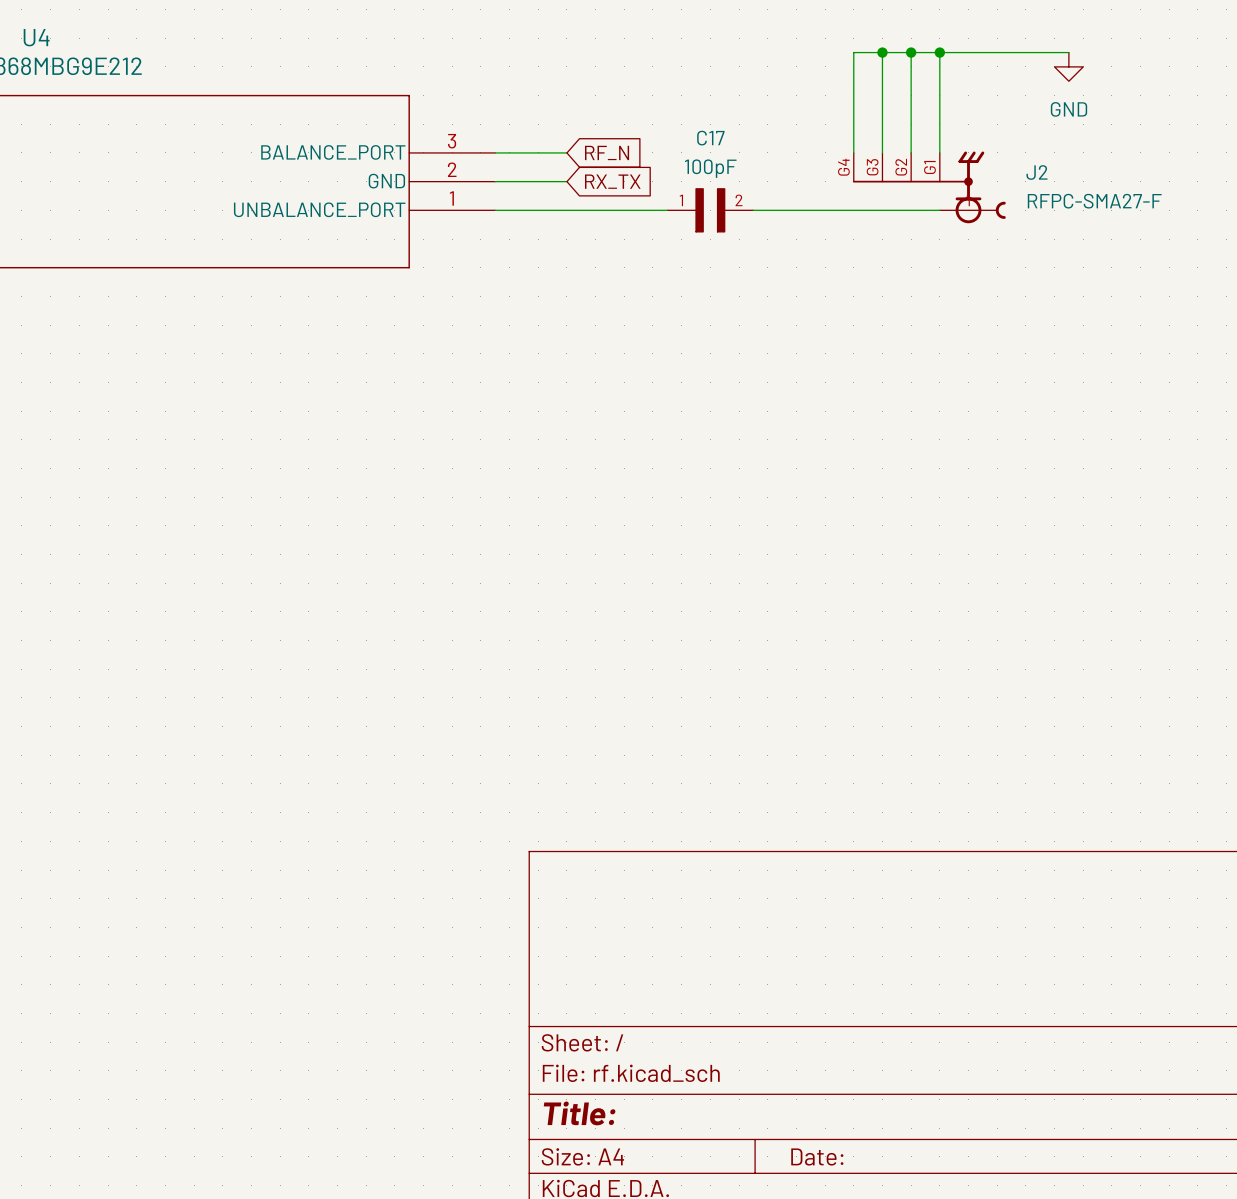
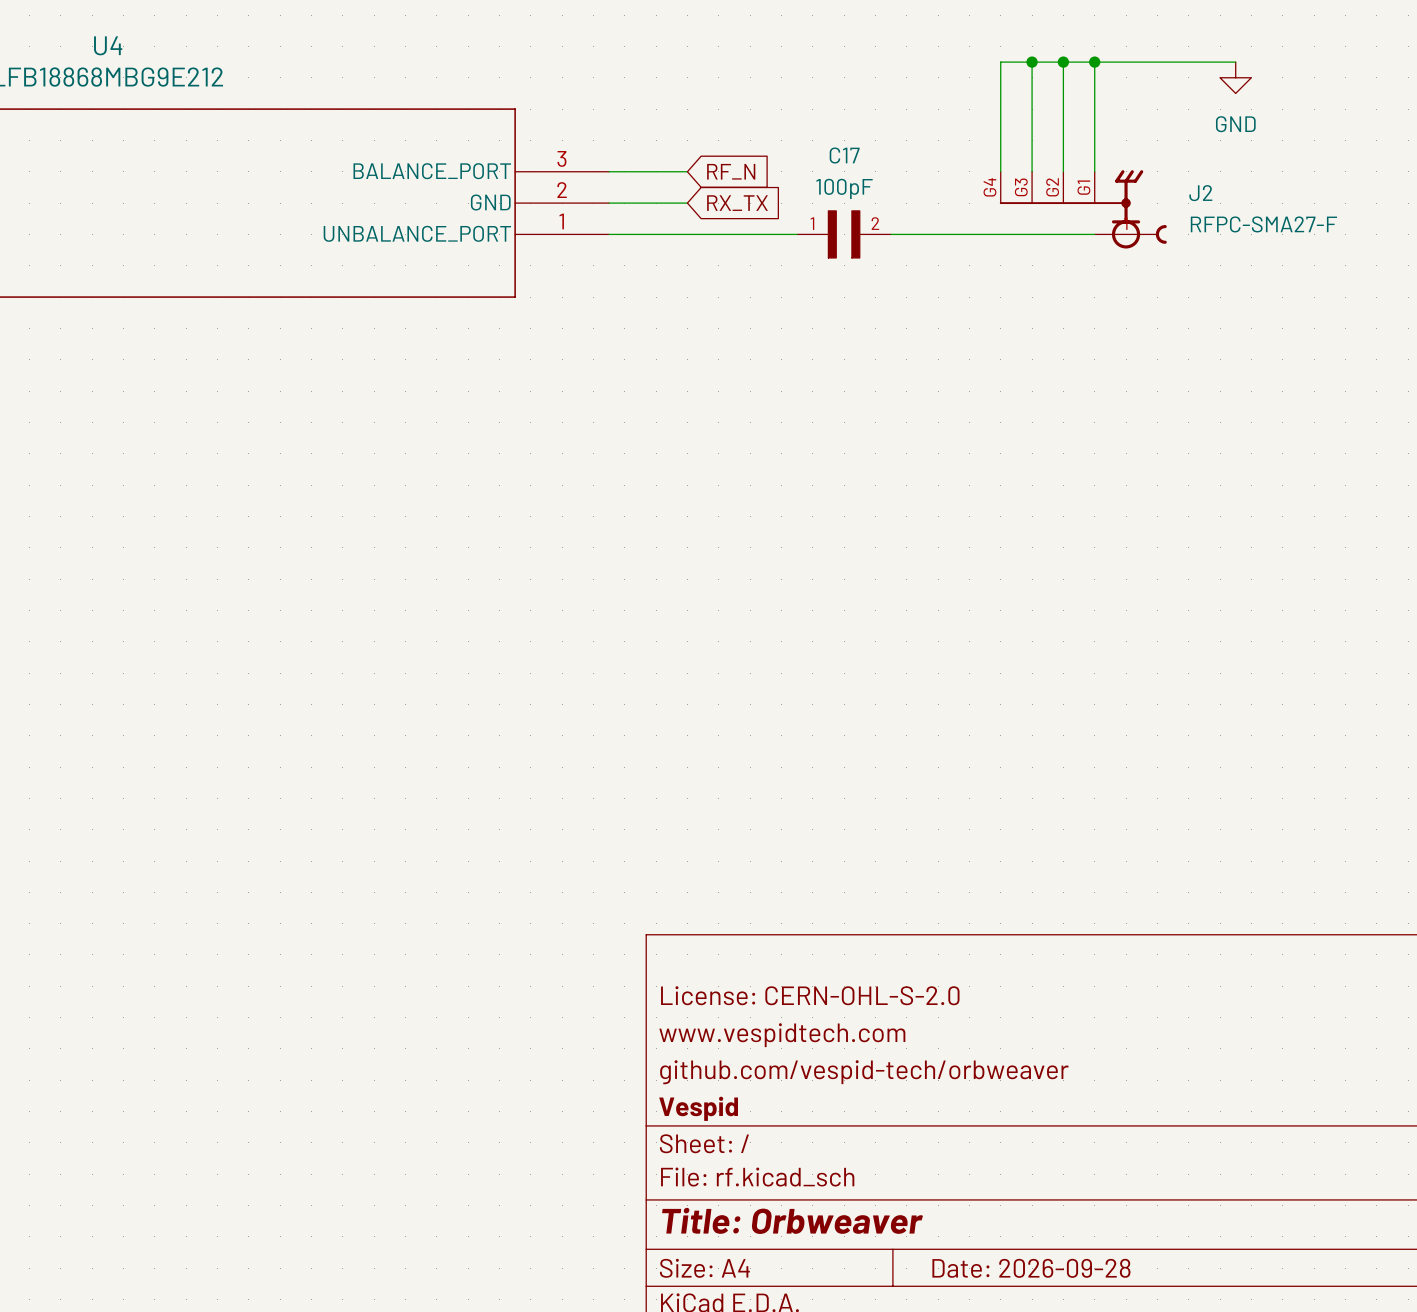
title block: none -> License: CERN-OHL-S-2.0 (810, 995)
title block: none -> www.vespidtech.com (782, 1035)
title block: none -> github.com/vespid-tech/orbweaver (864, 1072)
title block: none -> Vespid (698, 1108)
title block: Title: (579, 1113) -> Title: Orbweaver (792, 1220)
title block: Date: (817, 1157) -> Date: 2026-09-28 (1031, 1268)

